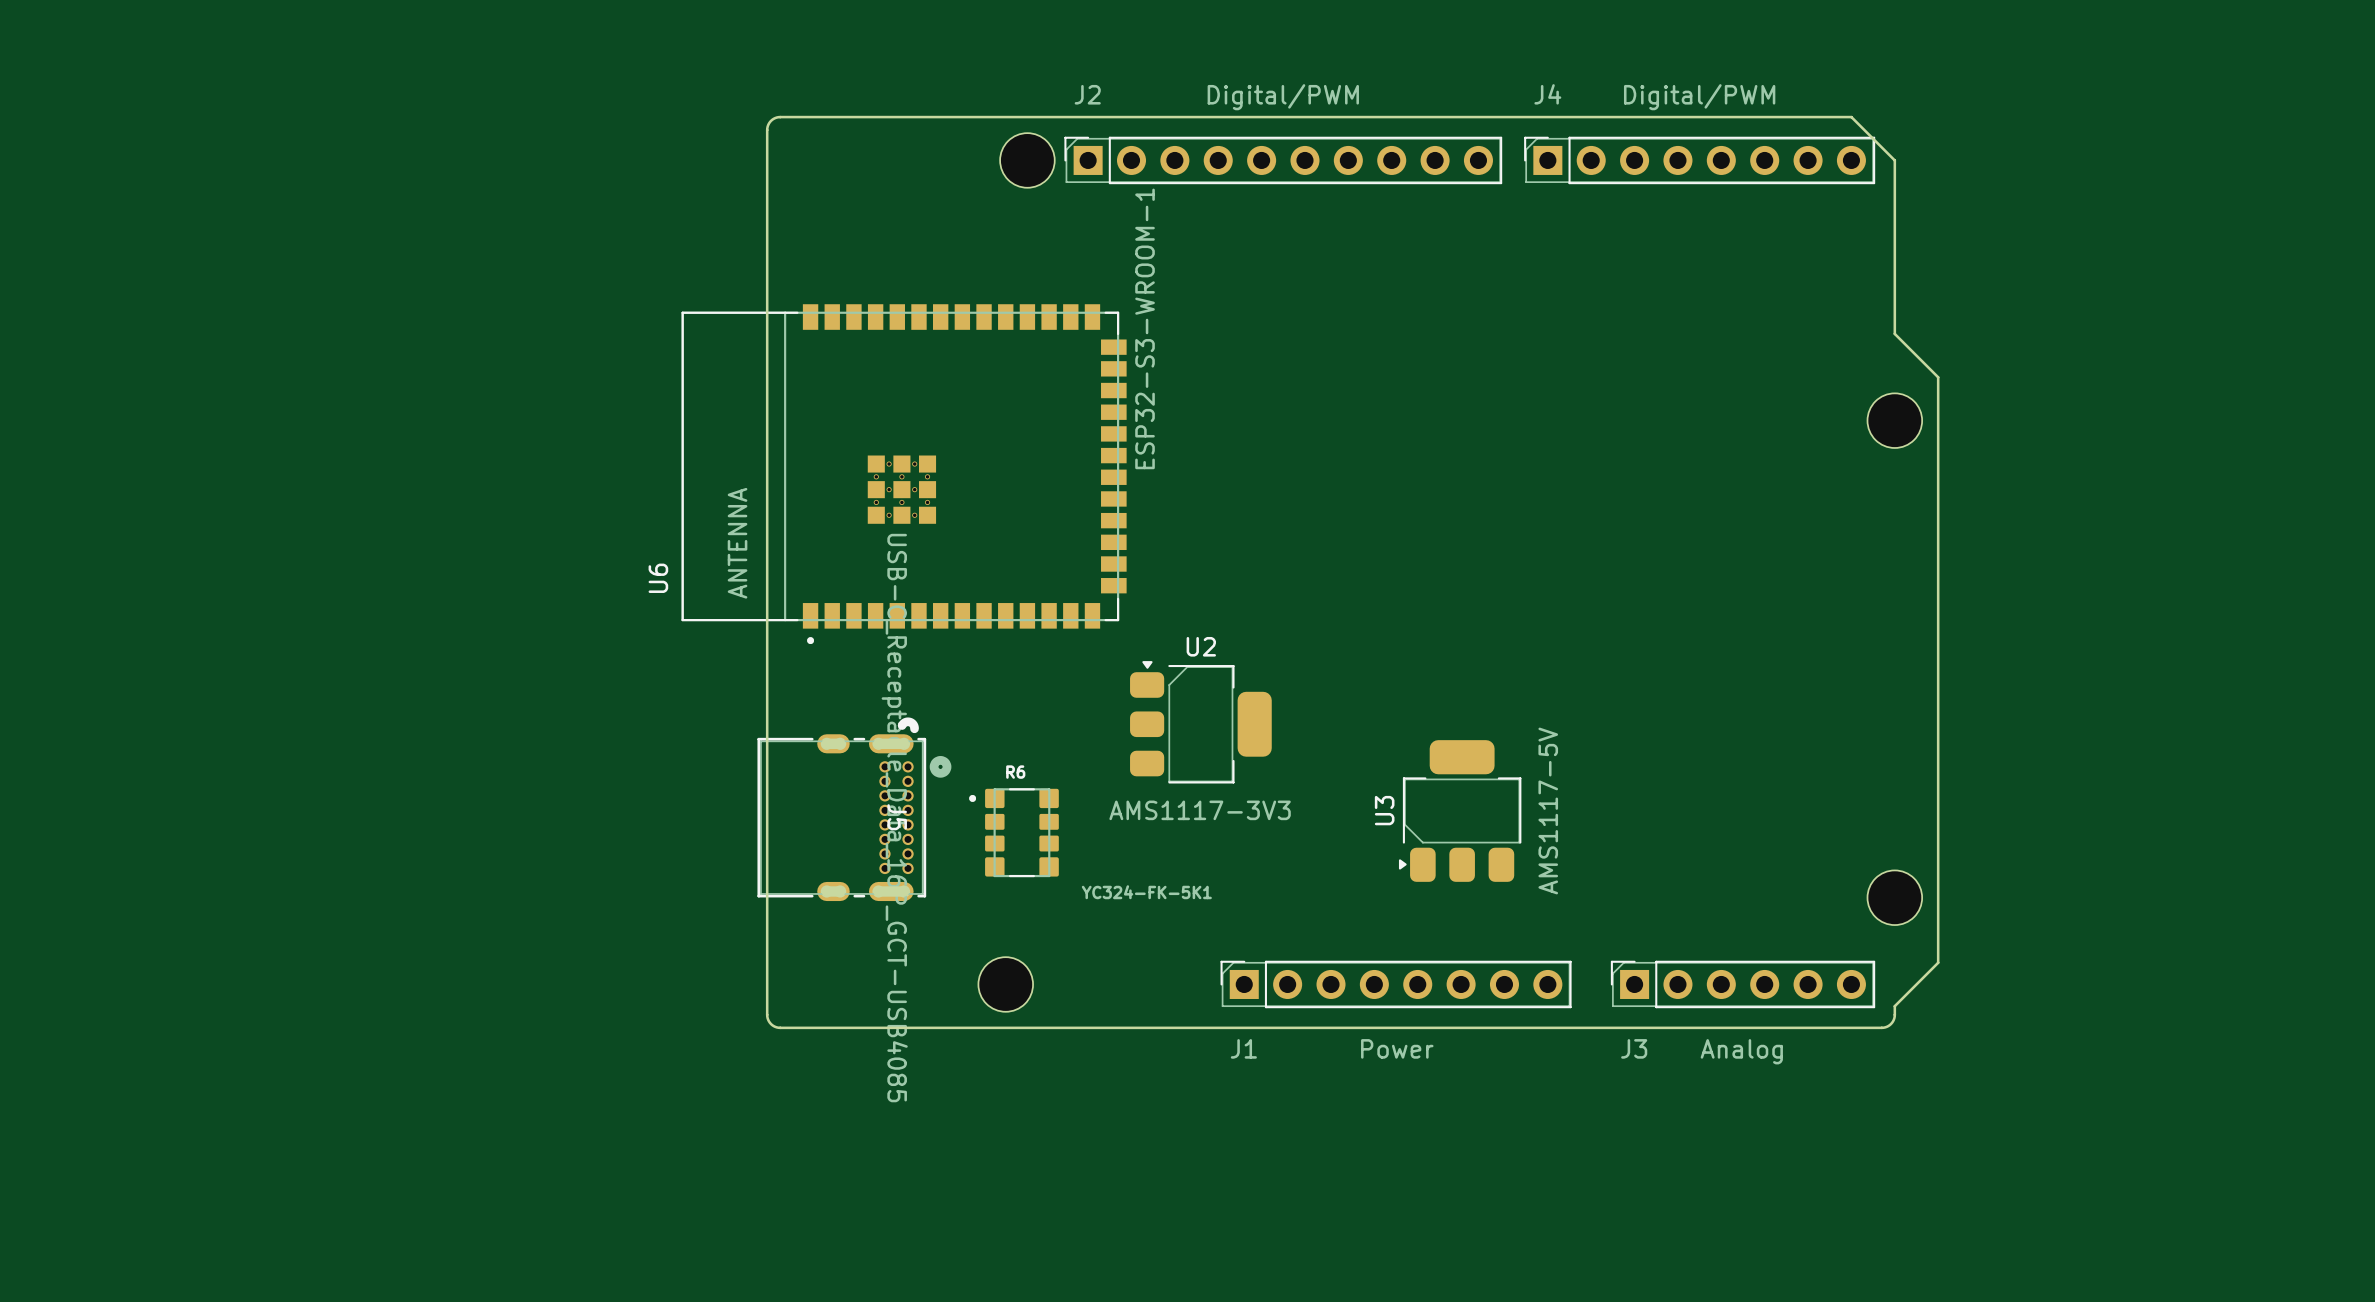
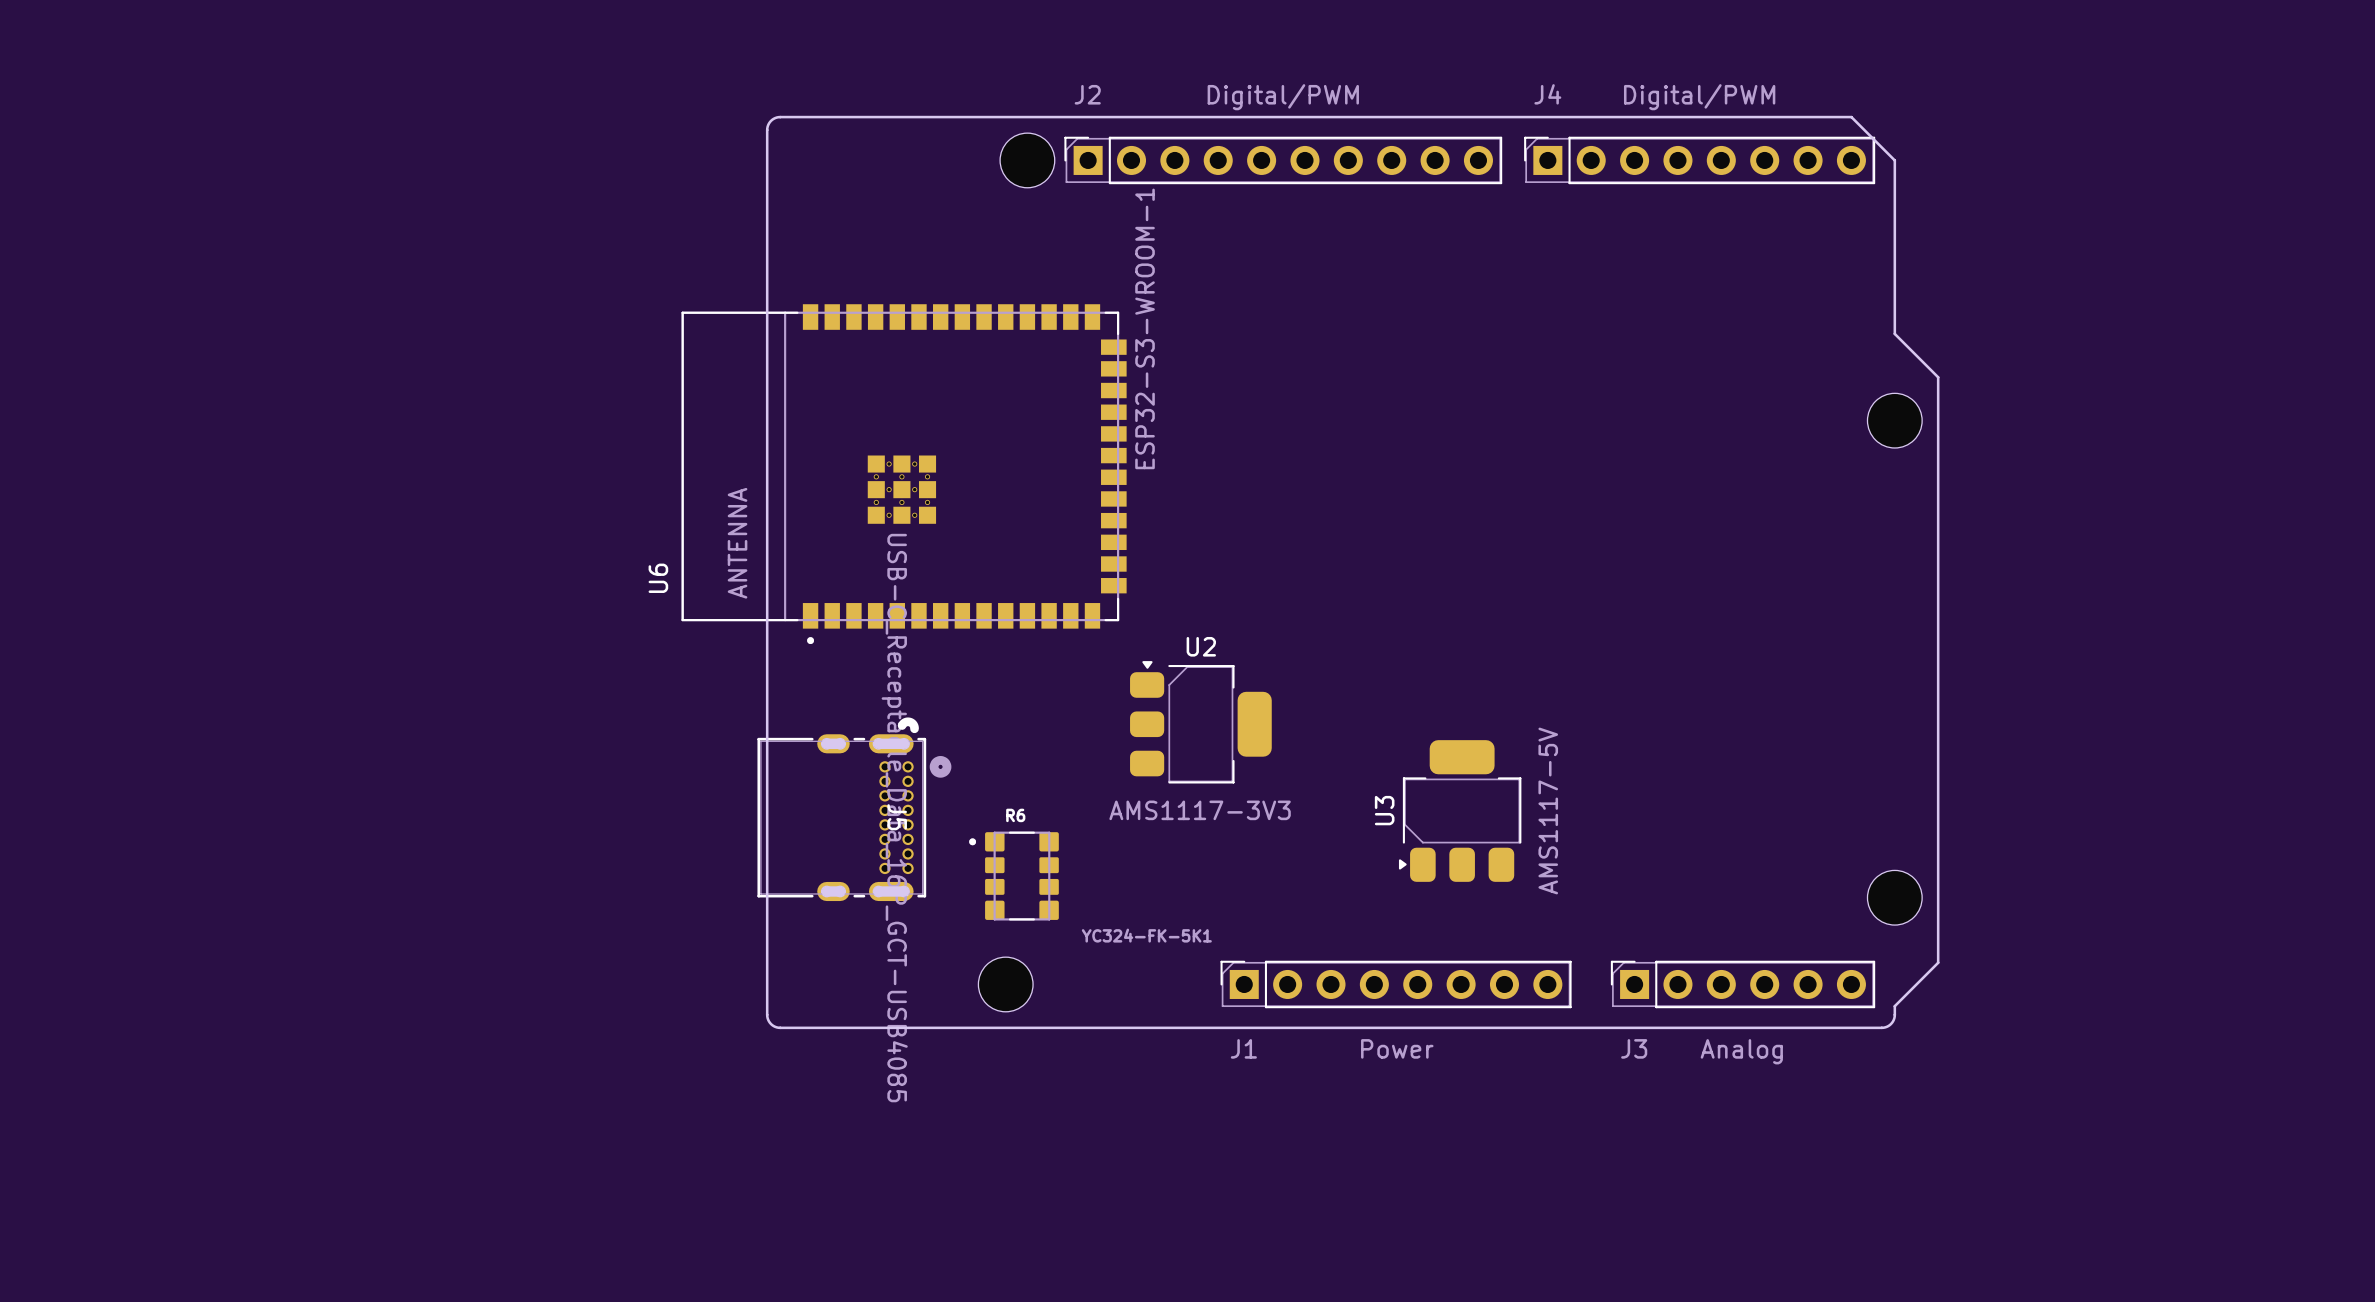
R6 position: (1014, 832) -> (1014, 876)

